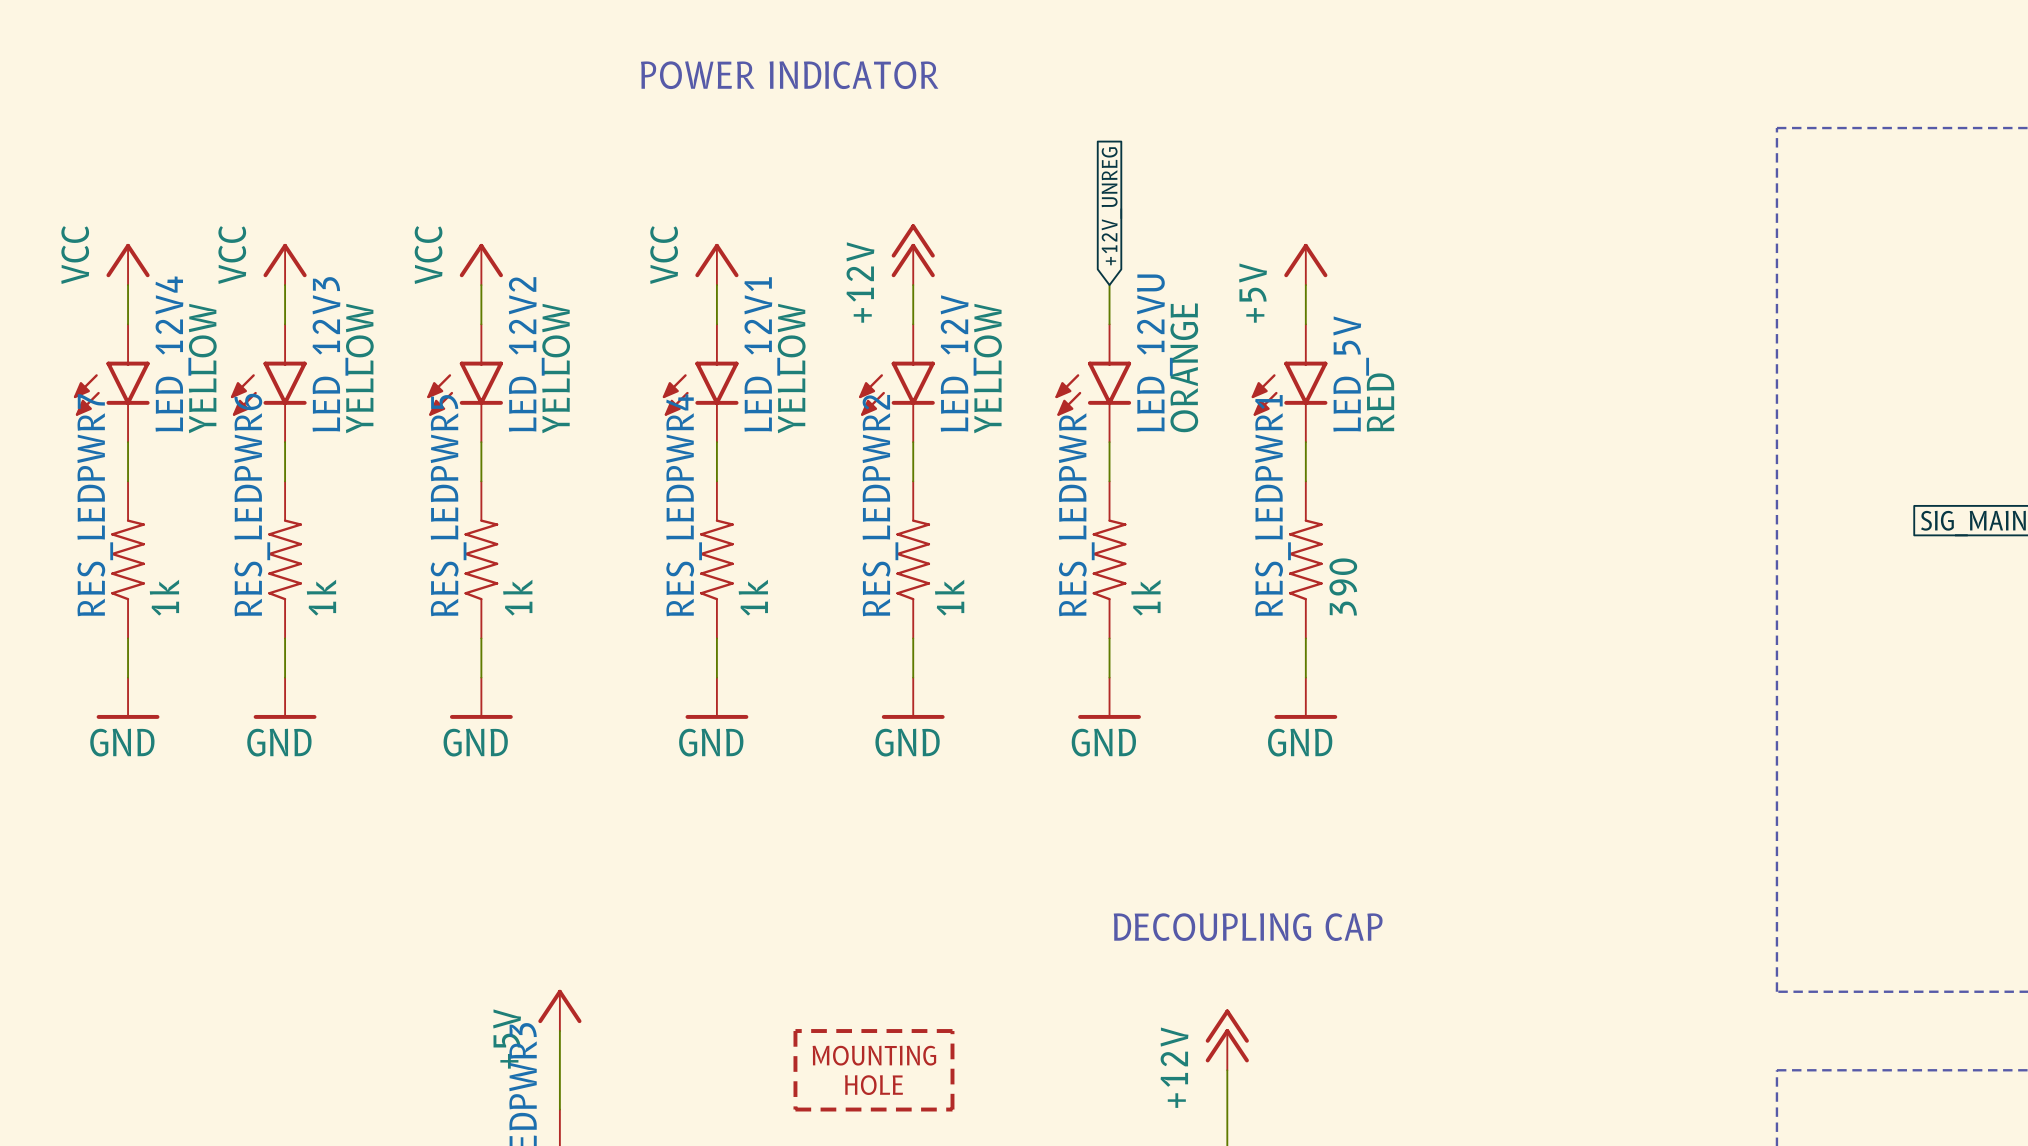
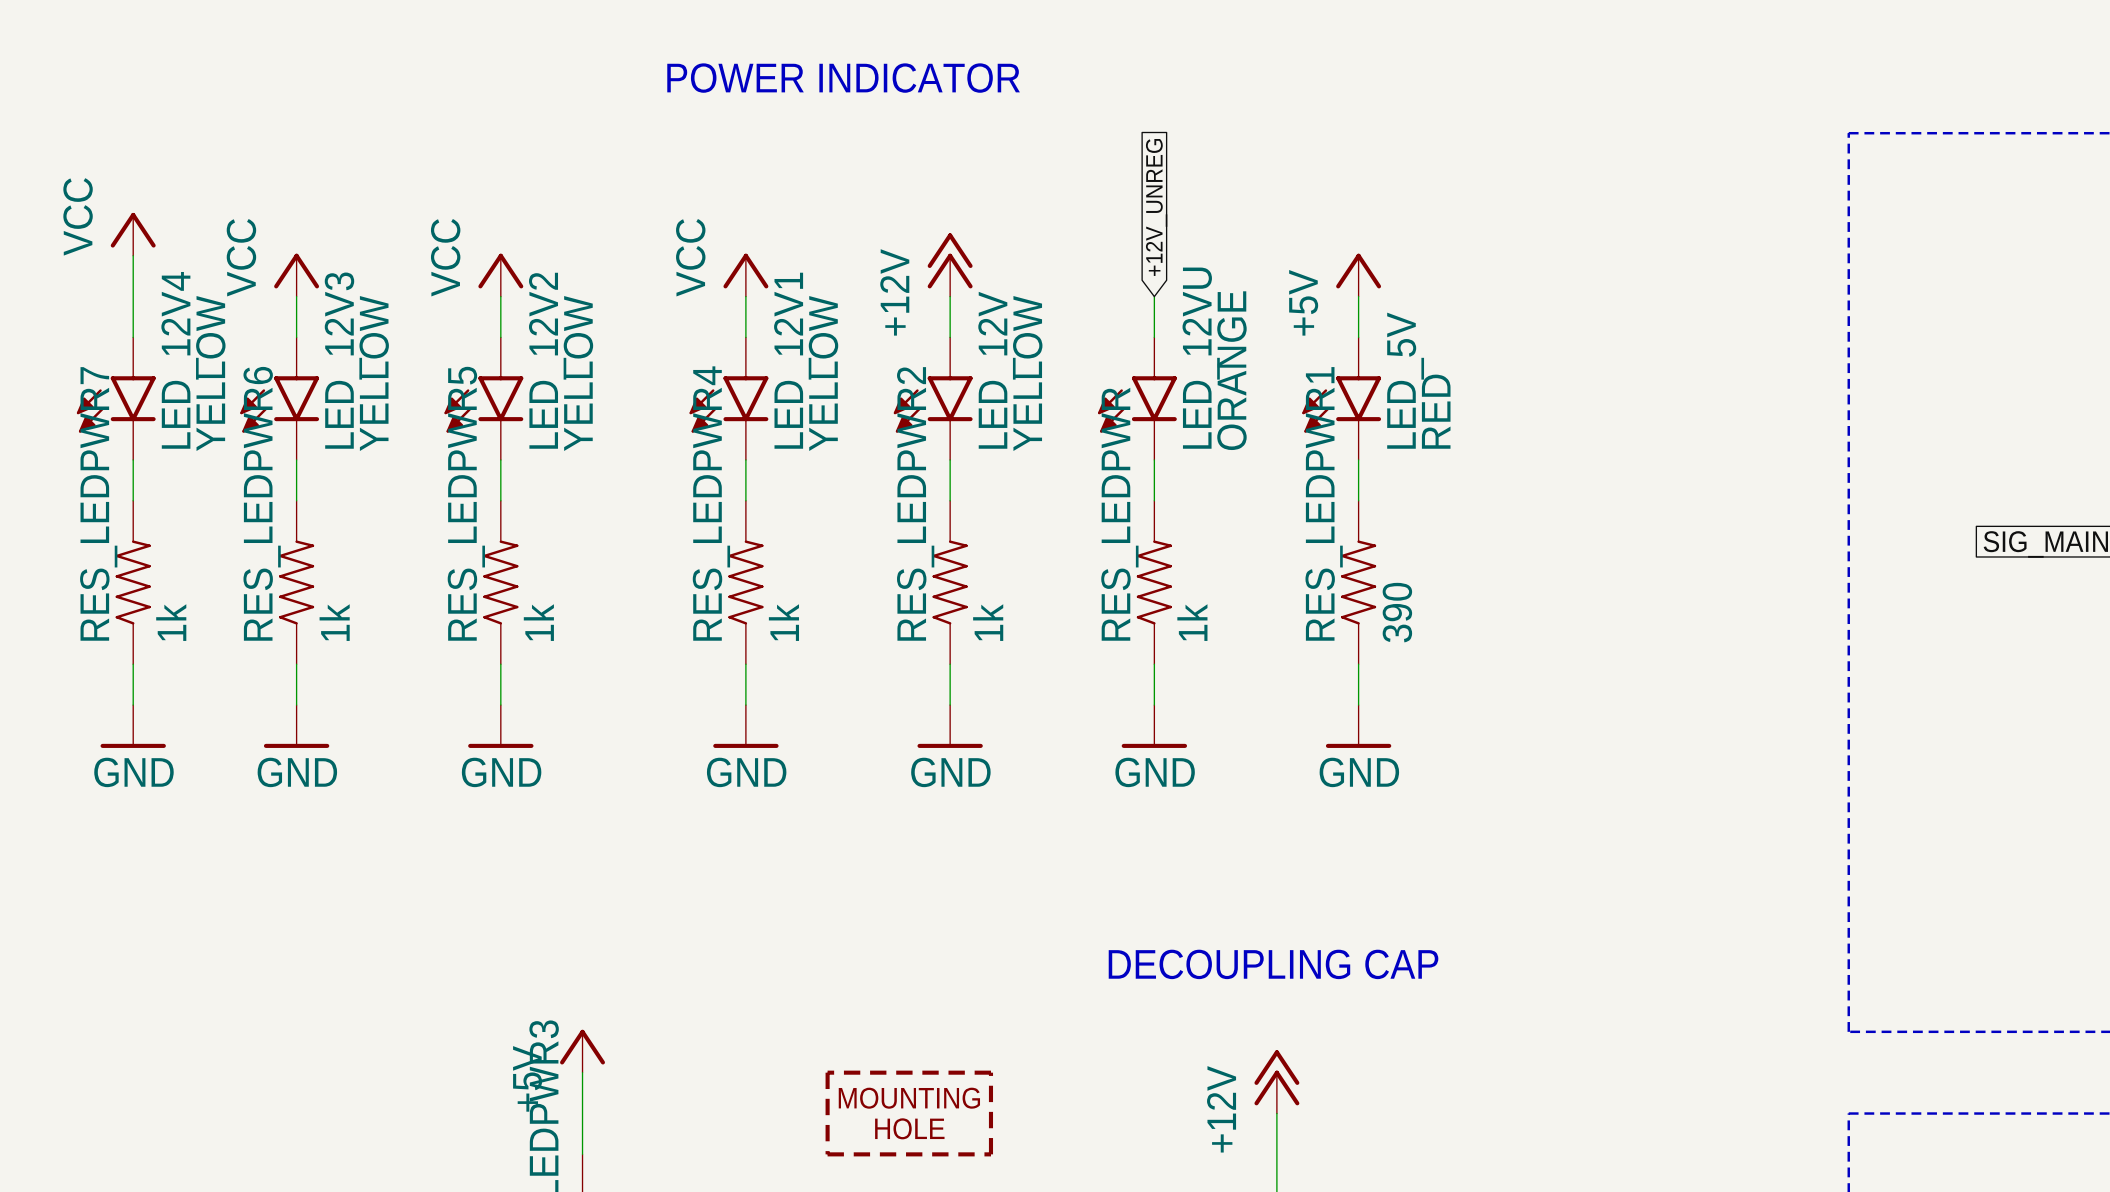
power symbol position: VCC (128, 264) -> VCC (133, 234)

